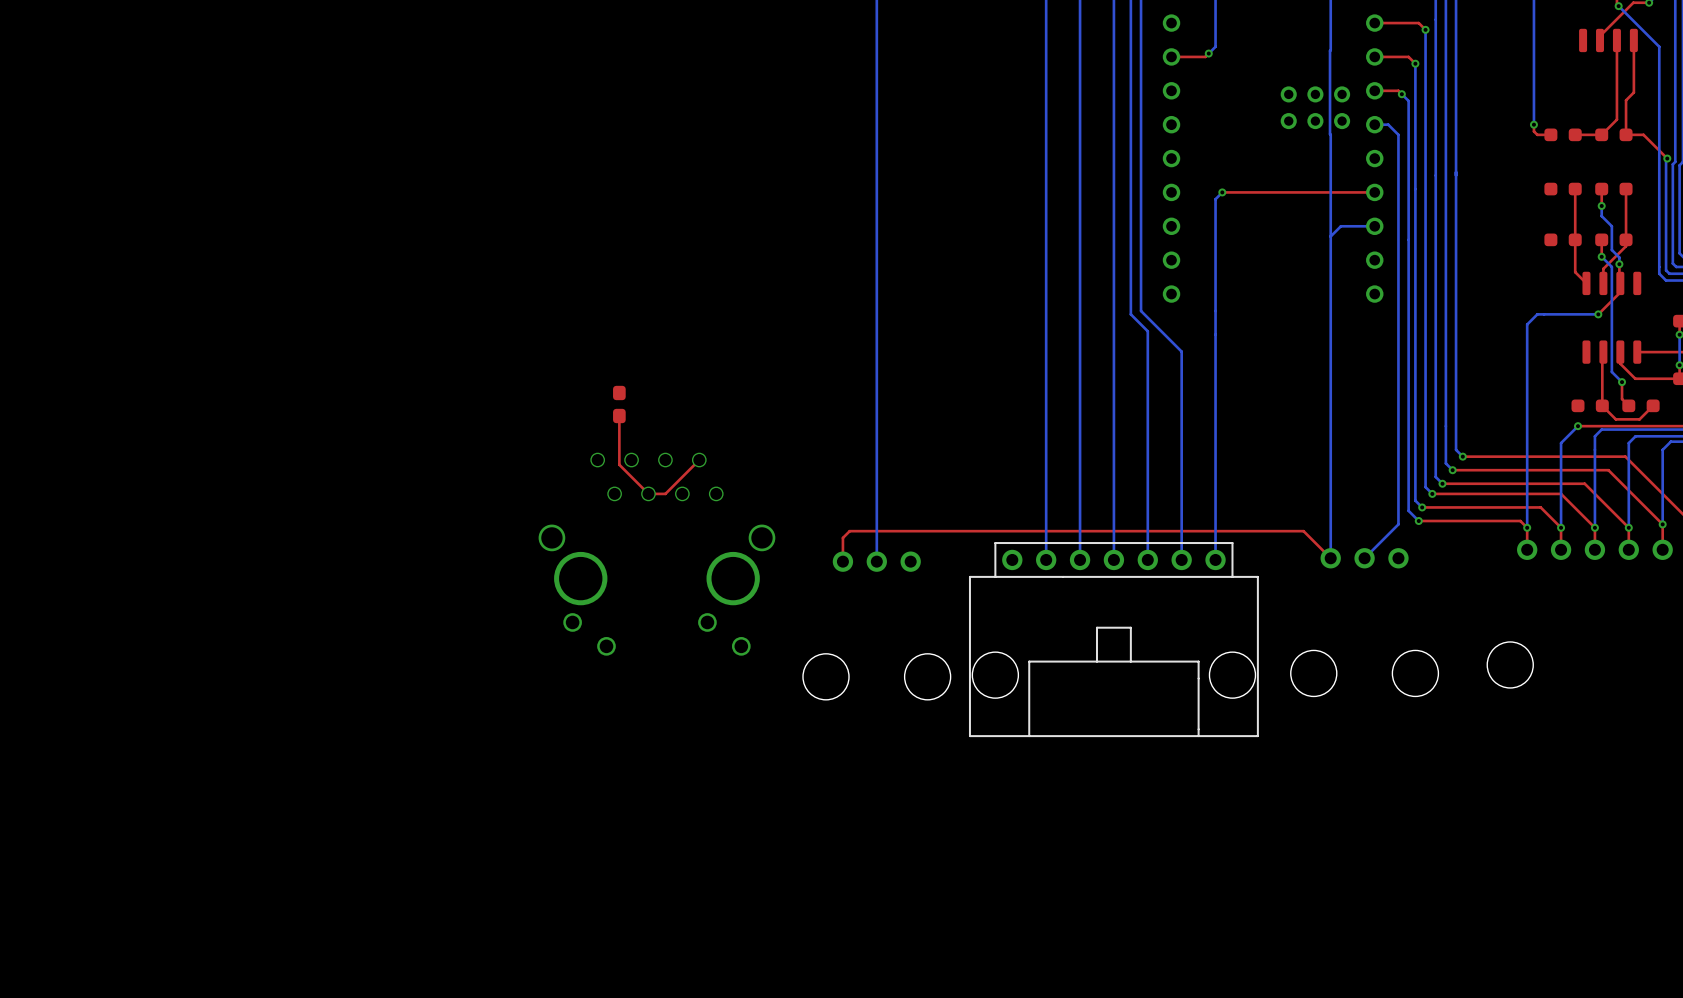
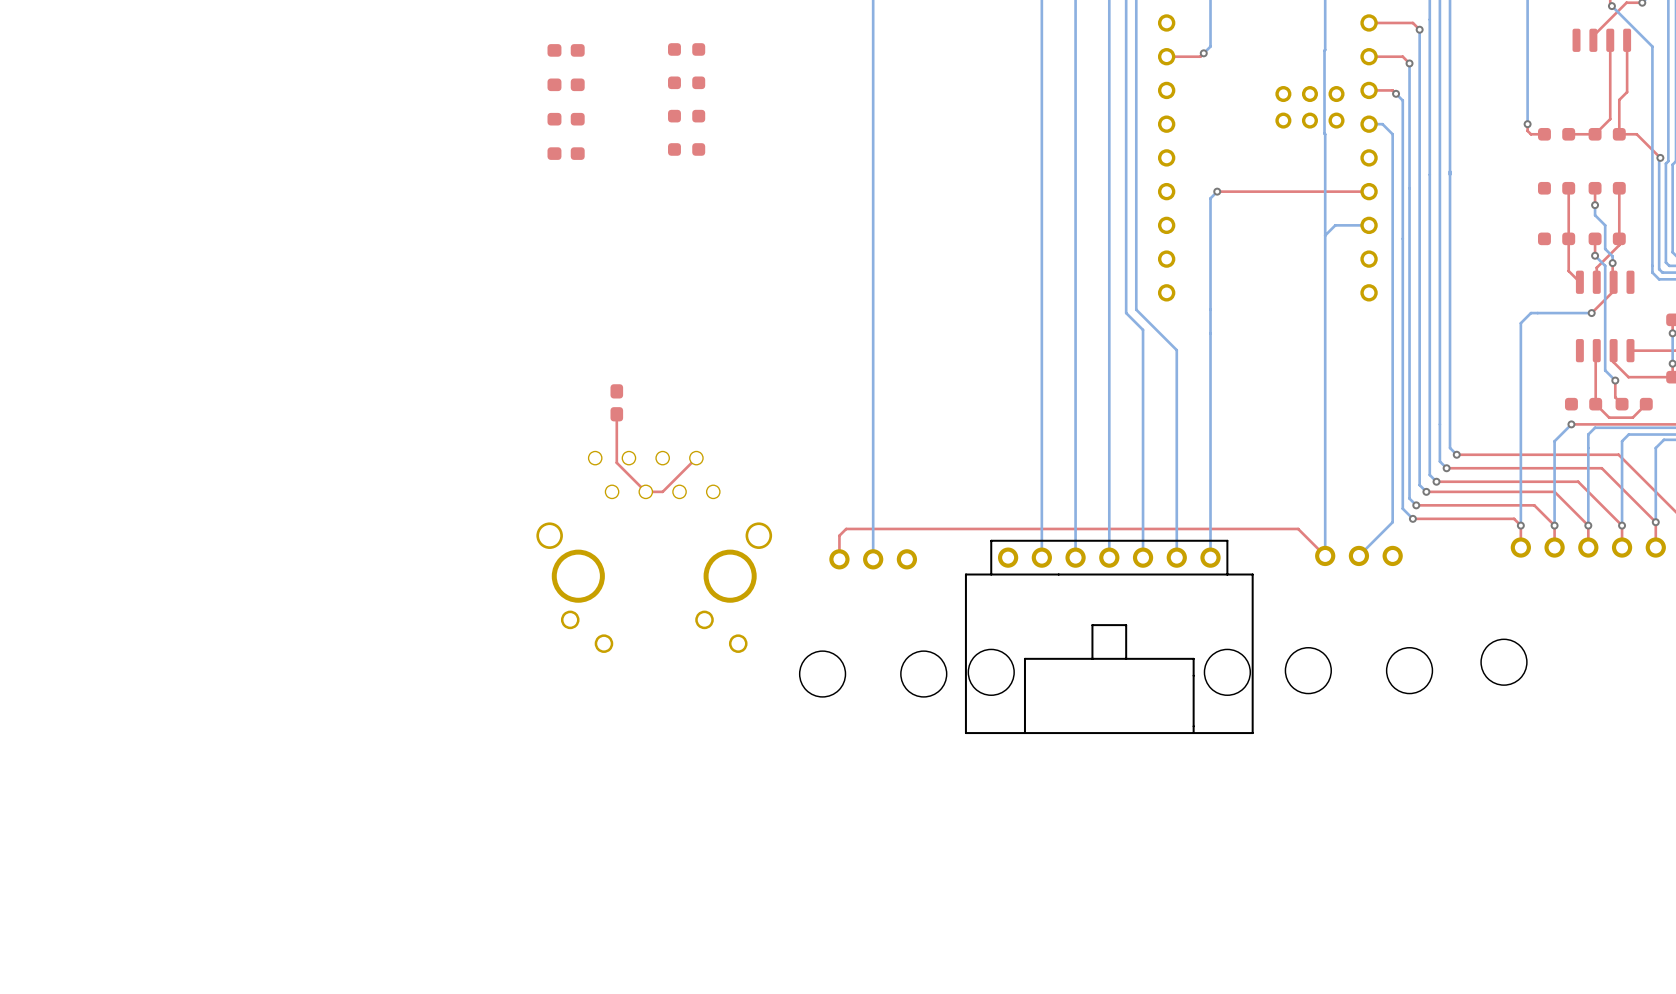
part: none -> (686, 49)
part: none -> (566, 50)
part: none -> (686, 82)
part: none -> (566, 84)
part: none -> (686, 116)
part: none -> (566, 119)
part: none -> (686, 149)
part: none -> (566, 153)

